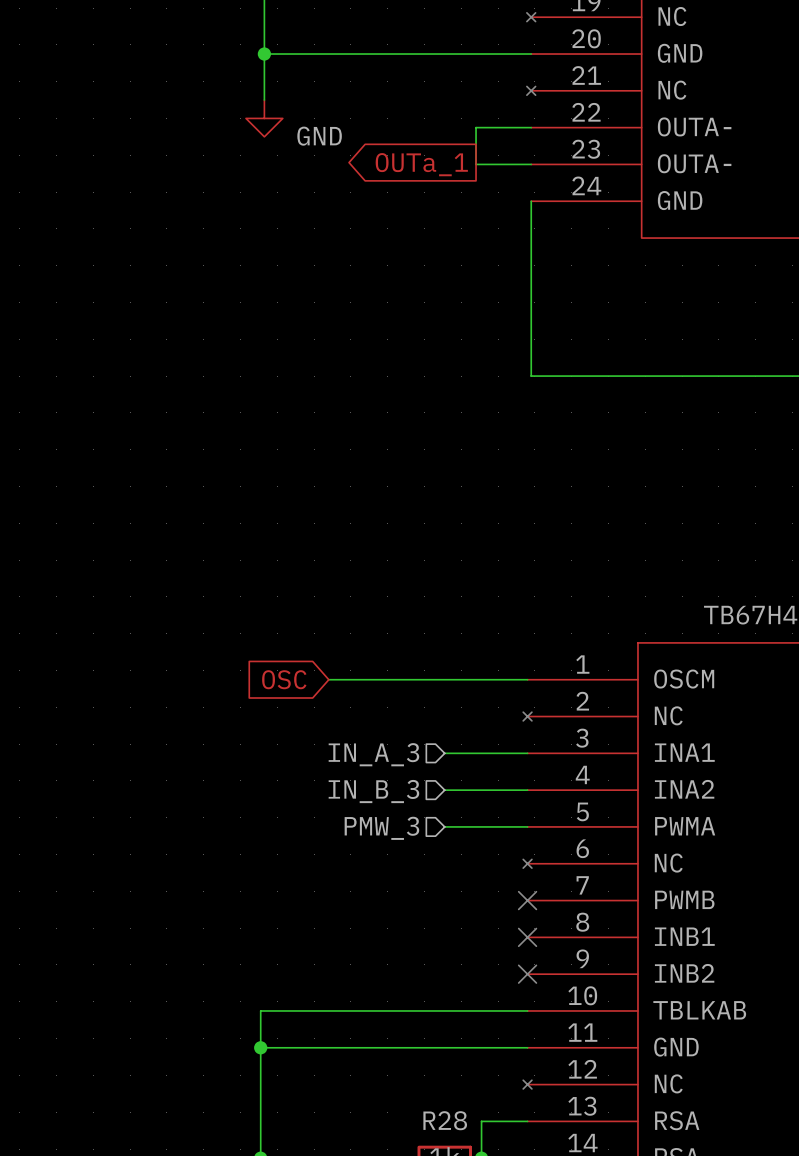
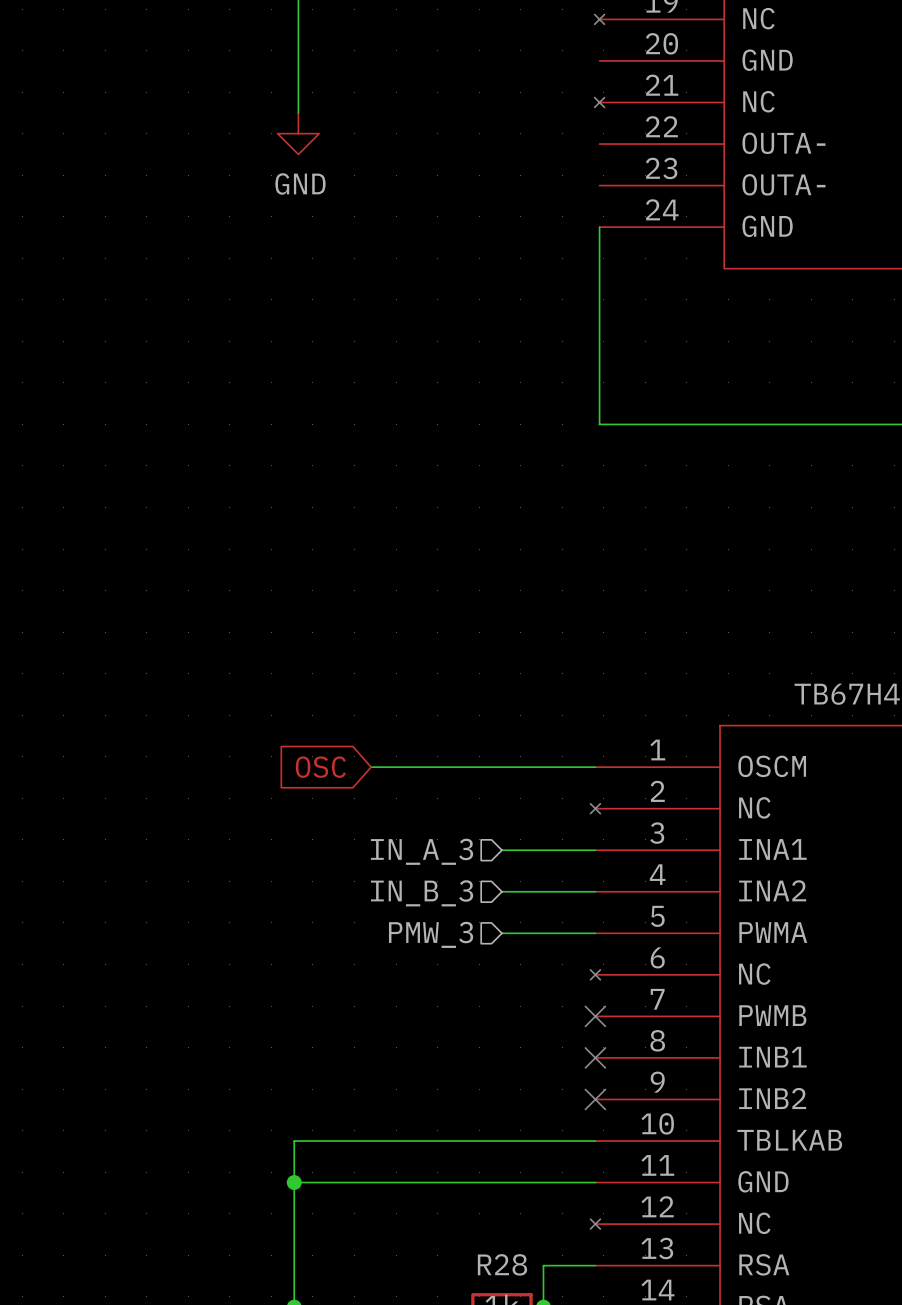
wire: (264, 54) (531, 54) -> none
junction: (264, 54) -> none
wire: (531, 127) (476, 127) (476, 164) (531, 164) -> none
power symbol text position: GND (319, 136) -> GND (300, 183)
global label: OUTa_1 (421, 164) -> none

